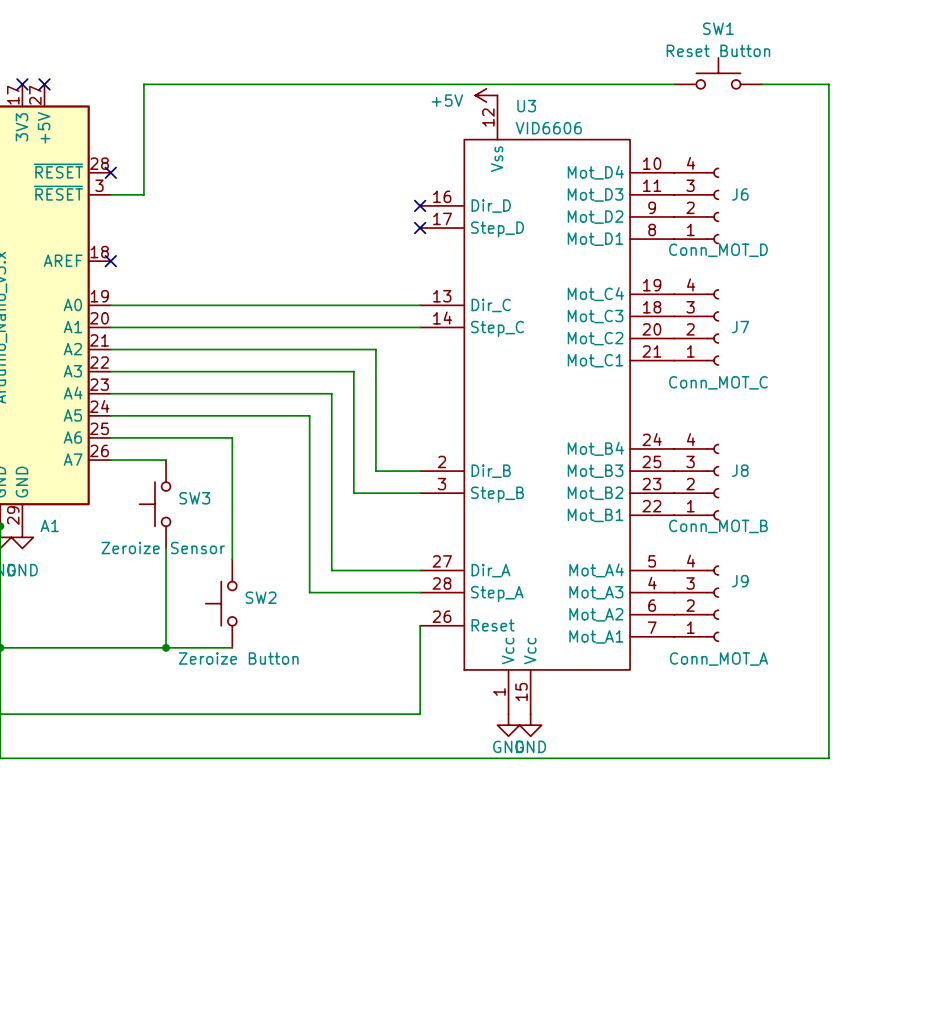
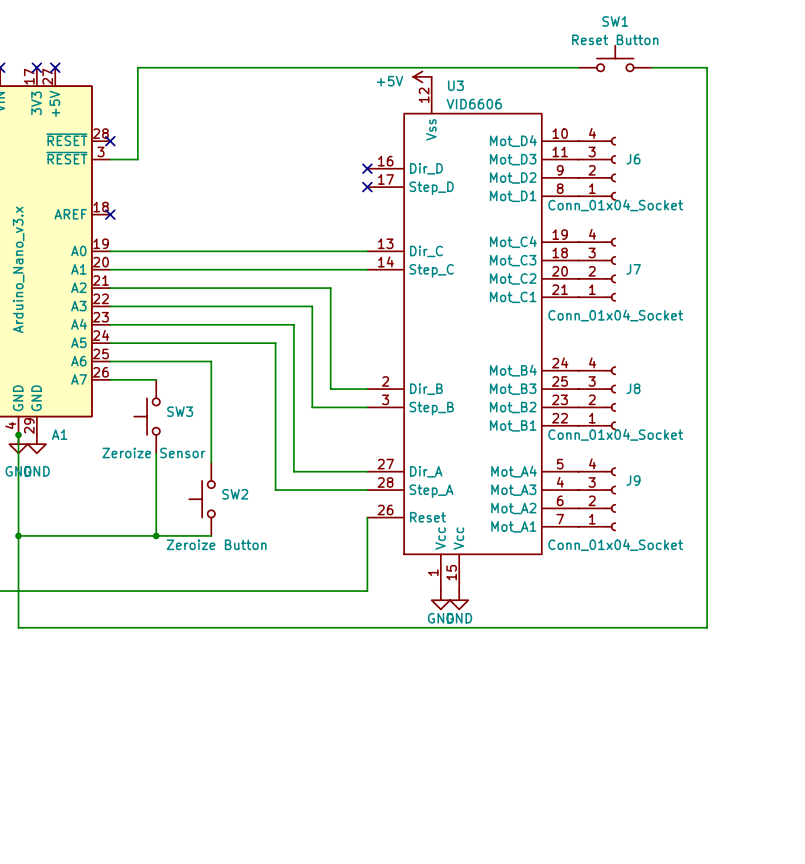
J6 value: Conn_MOT_D (718, 250) -> Conn_01x04_Socket (615, 205)
J7 value: Conn_MOT_C (718, 382) -> Conn_01x04_Socket (615, 315)
J8 value: Conn_MOT_B (718, 526) -> Conn_01x04_Socket (615, 434)
J9 value: Conn_MOT_A (718, 659) -> Conn_01x04_Socket (615, 545)

